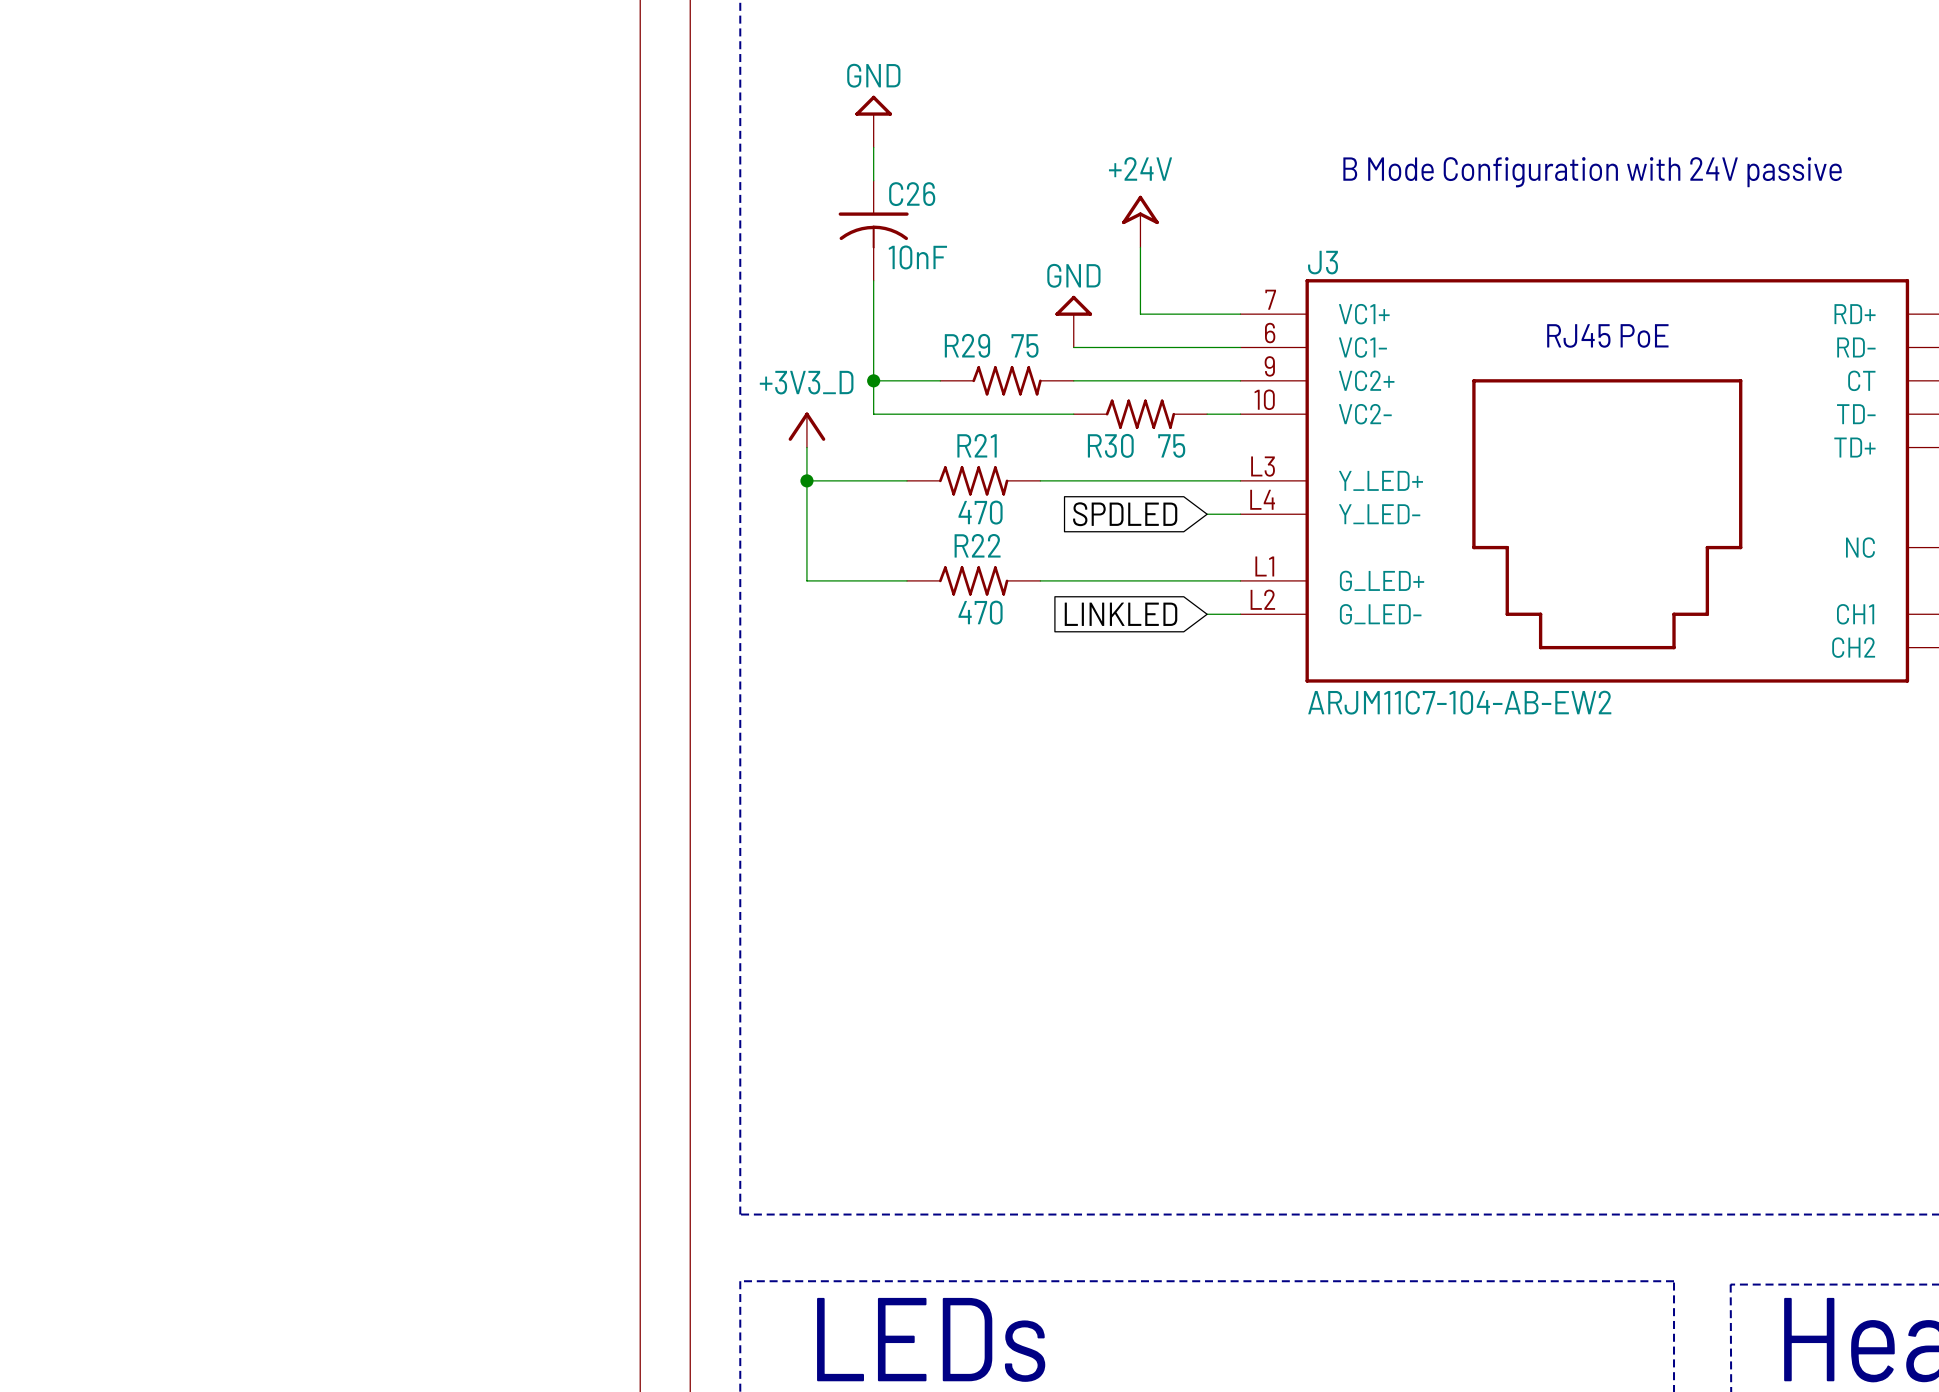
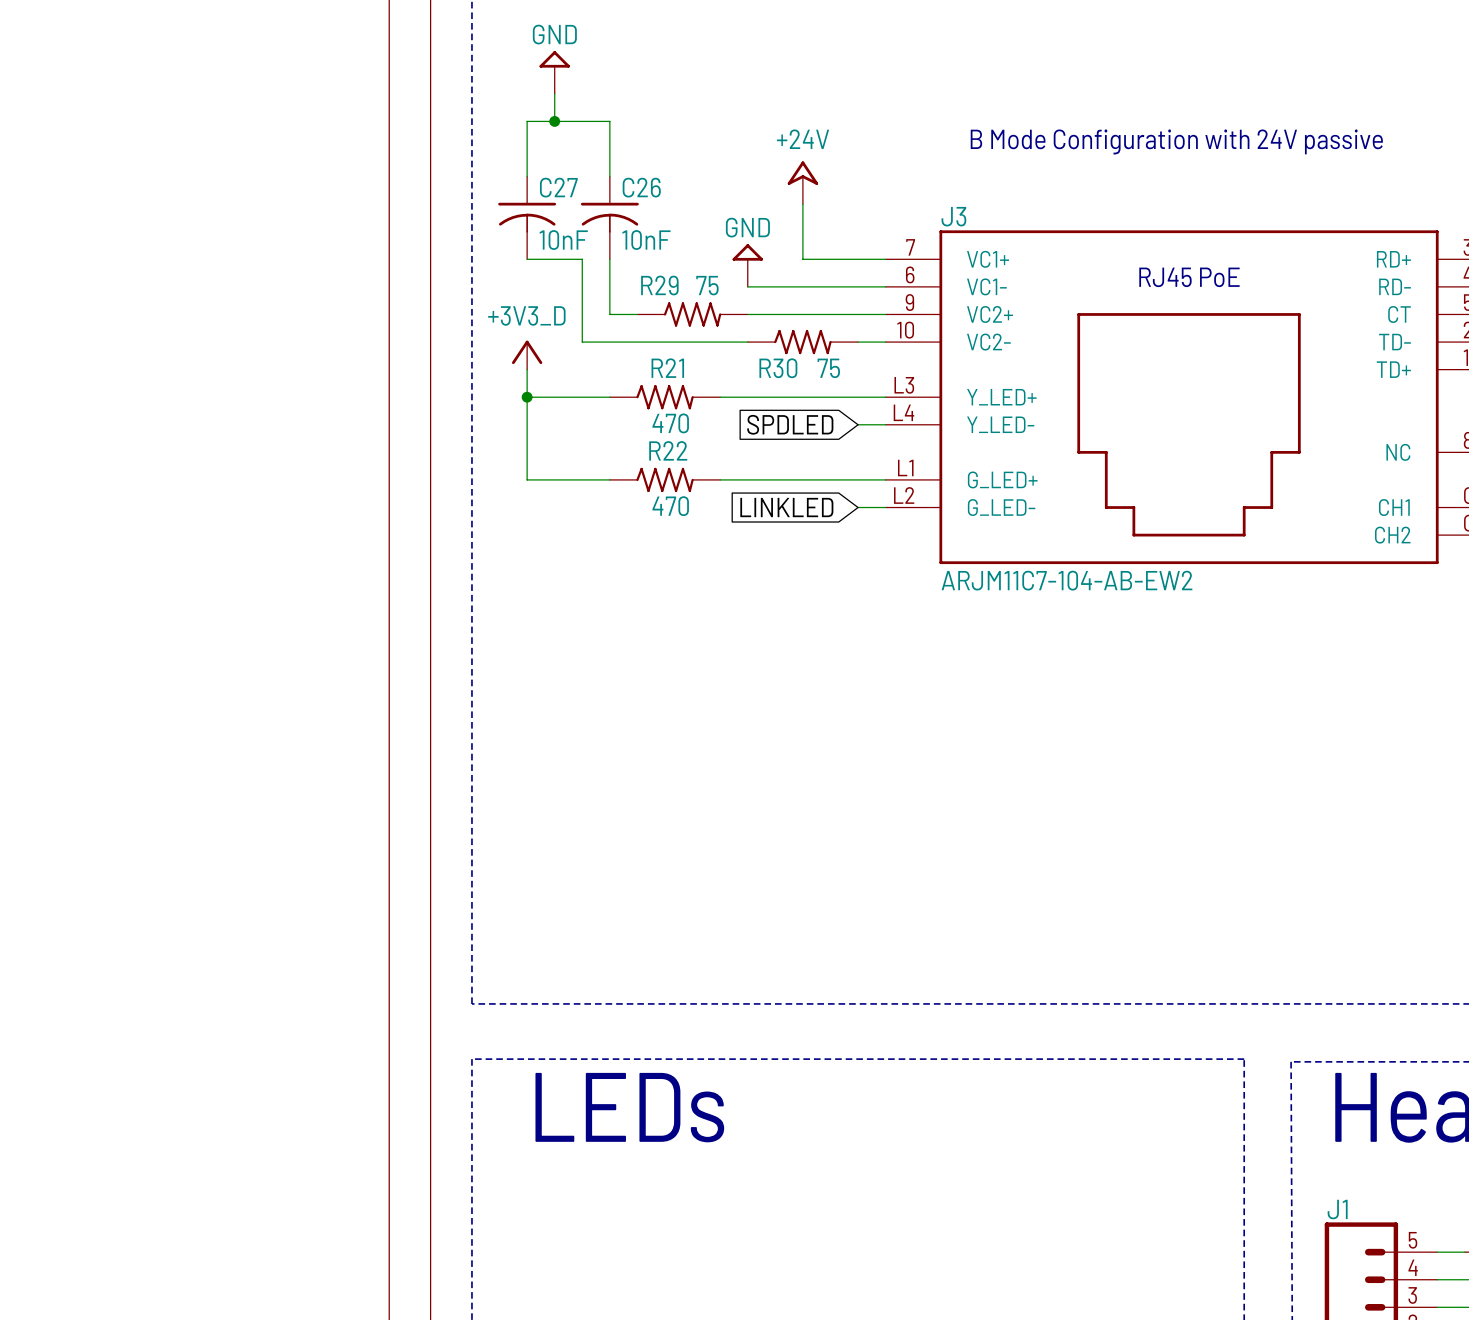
power symbol position: GND (873, 121) -> GND (554, 72)
junction: none -> (554, 121)
wire: (873, 147) (873, 180) -> (554, 93) (554, 121)
wire: none -> (527, 176) (527, 121) (609, 121) (609, 176)
C26 position: (873, 230) -> (609, 217)
C27: none -> 10nF (527, 217)
wire: (873, 280) (873, 314) -> (527, 259) (582, 259)
wire: (873, 380) (907, 380) -> (609, 259) (609, 314)
junction: (873, 380) -> none

